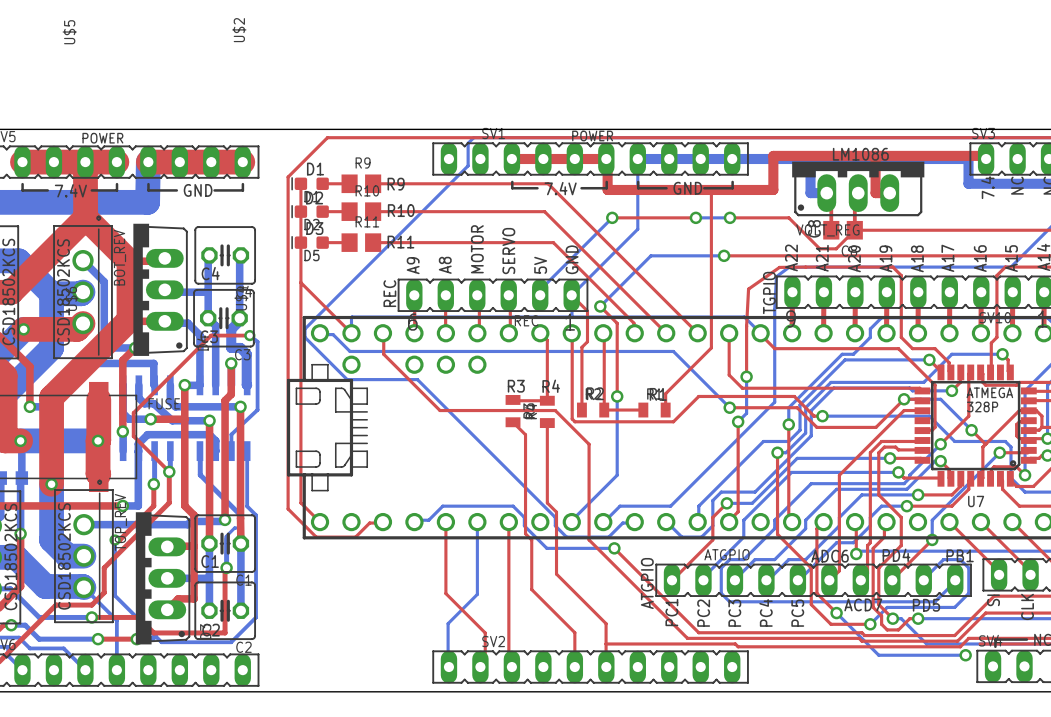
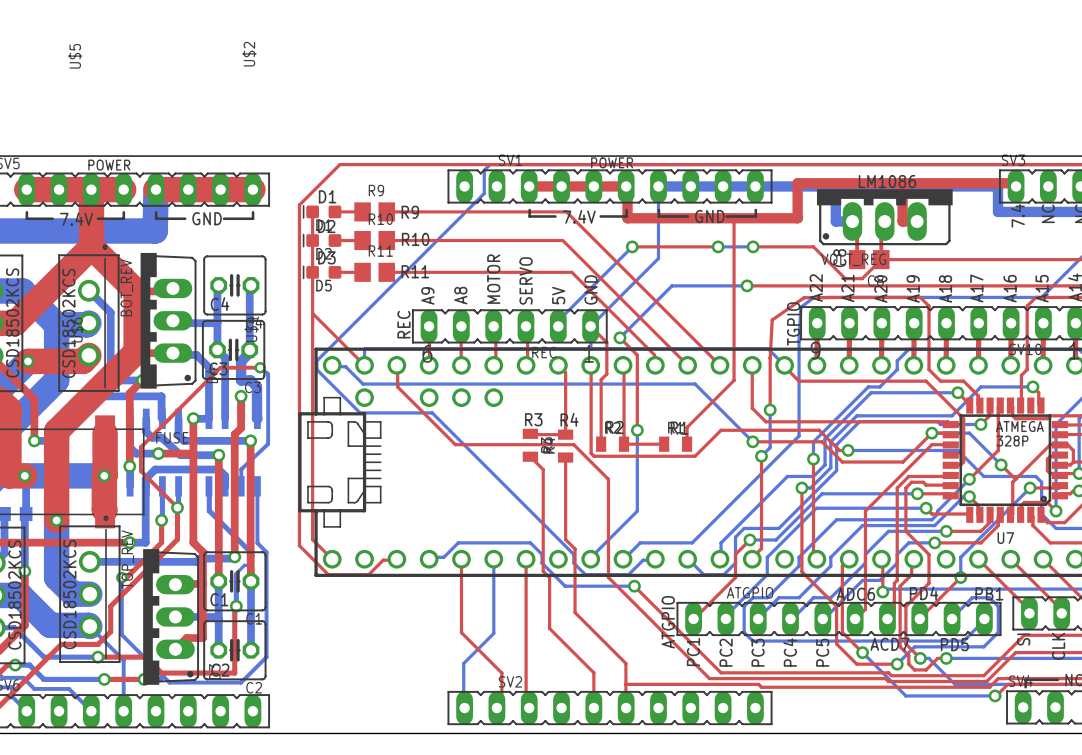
top track: none -> (1009, 684) (993, 698)

